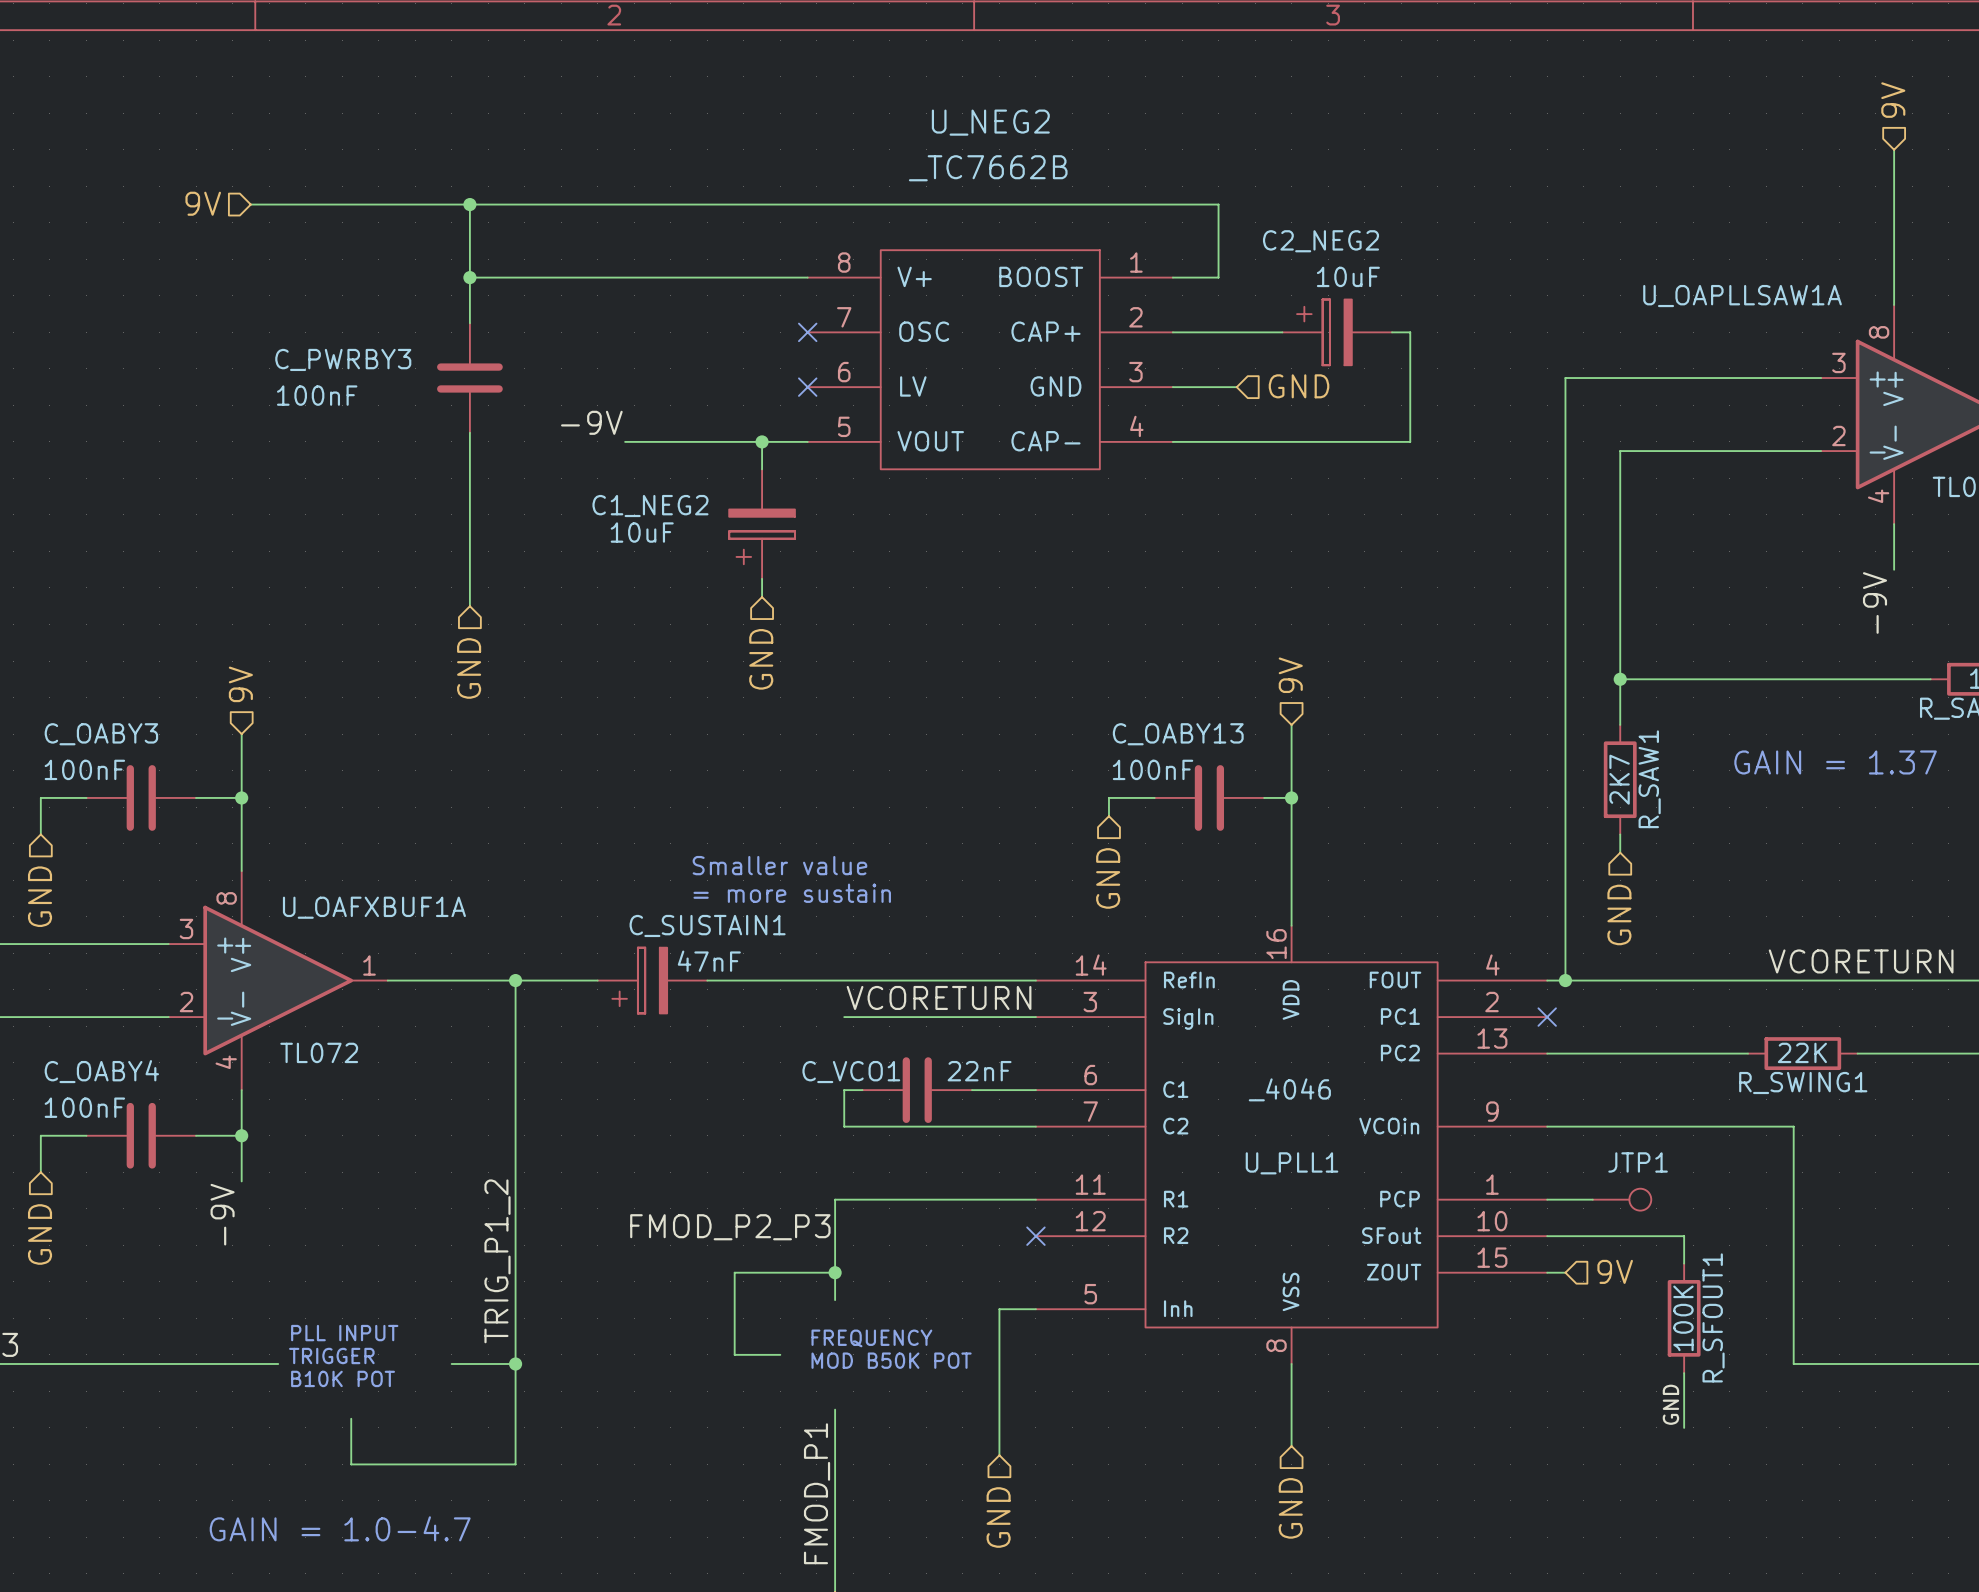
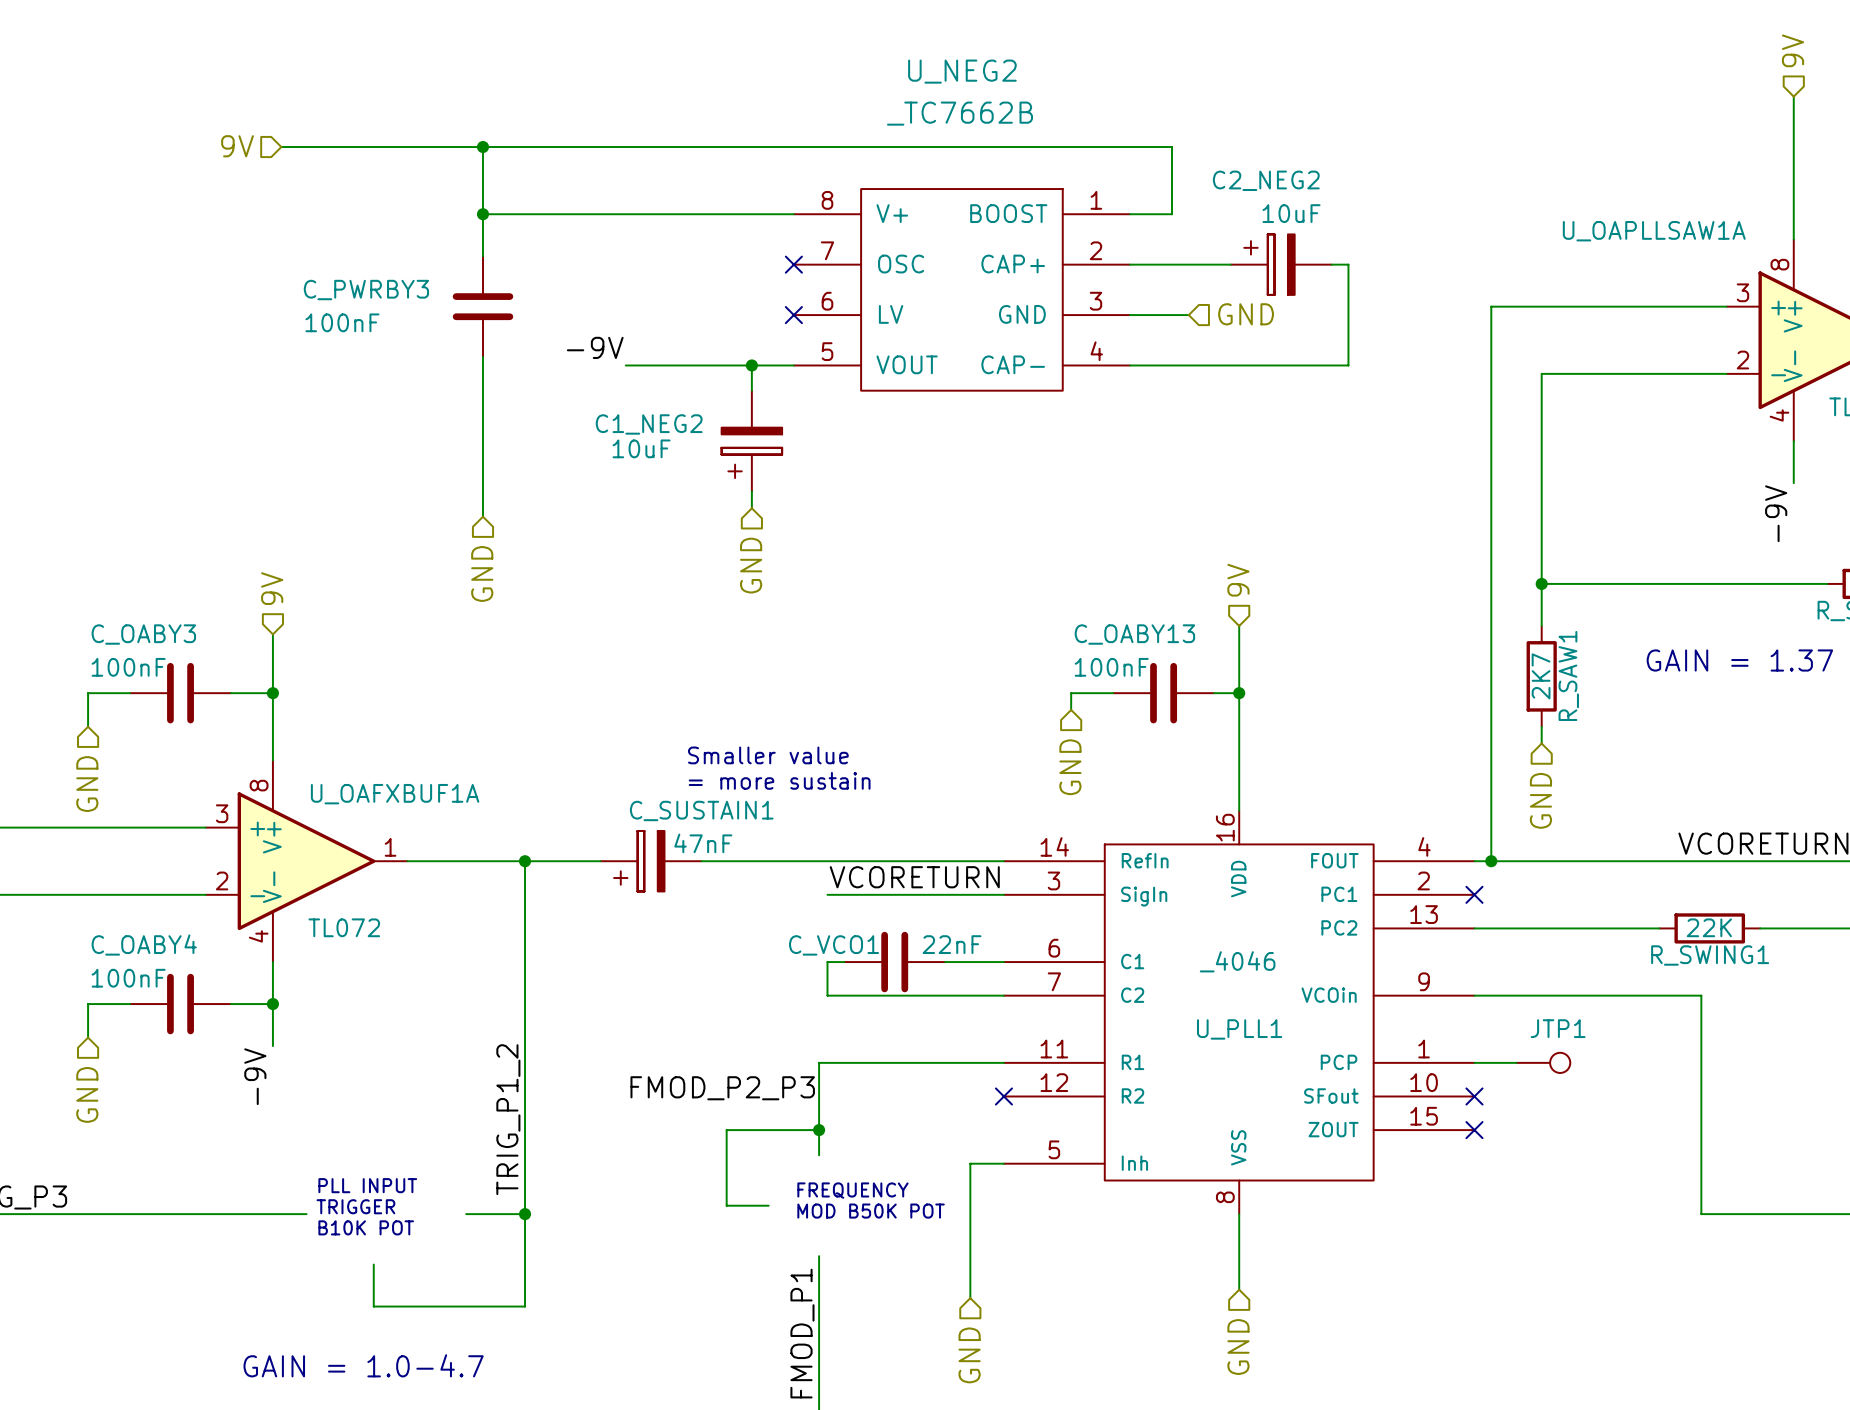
wire: (1547, 1236) (1684, 1236) (1684, 1263) -> none
no-connect mark: none -> (1474, 1096)
hierarchical label: 9V (1615, 1271) -> none
wire: (1547, 1272) (1565, 1272) -> none
no-connect mark: none -> (1474, 1130)
R_SFOUT1: 100K (1684, 1318) -> none
wire: (1684, 1373) (1684, 1427) -> none
label: GND (1670, 1404) -> none

